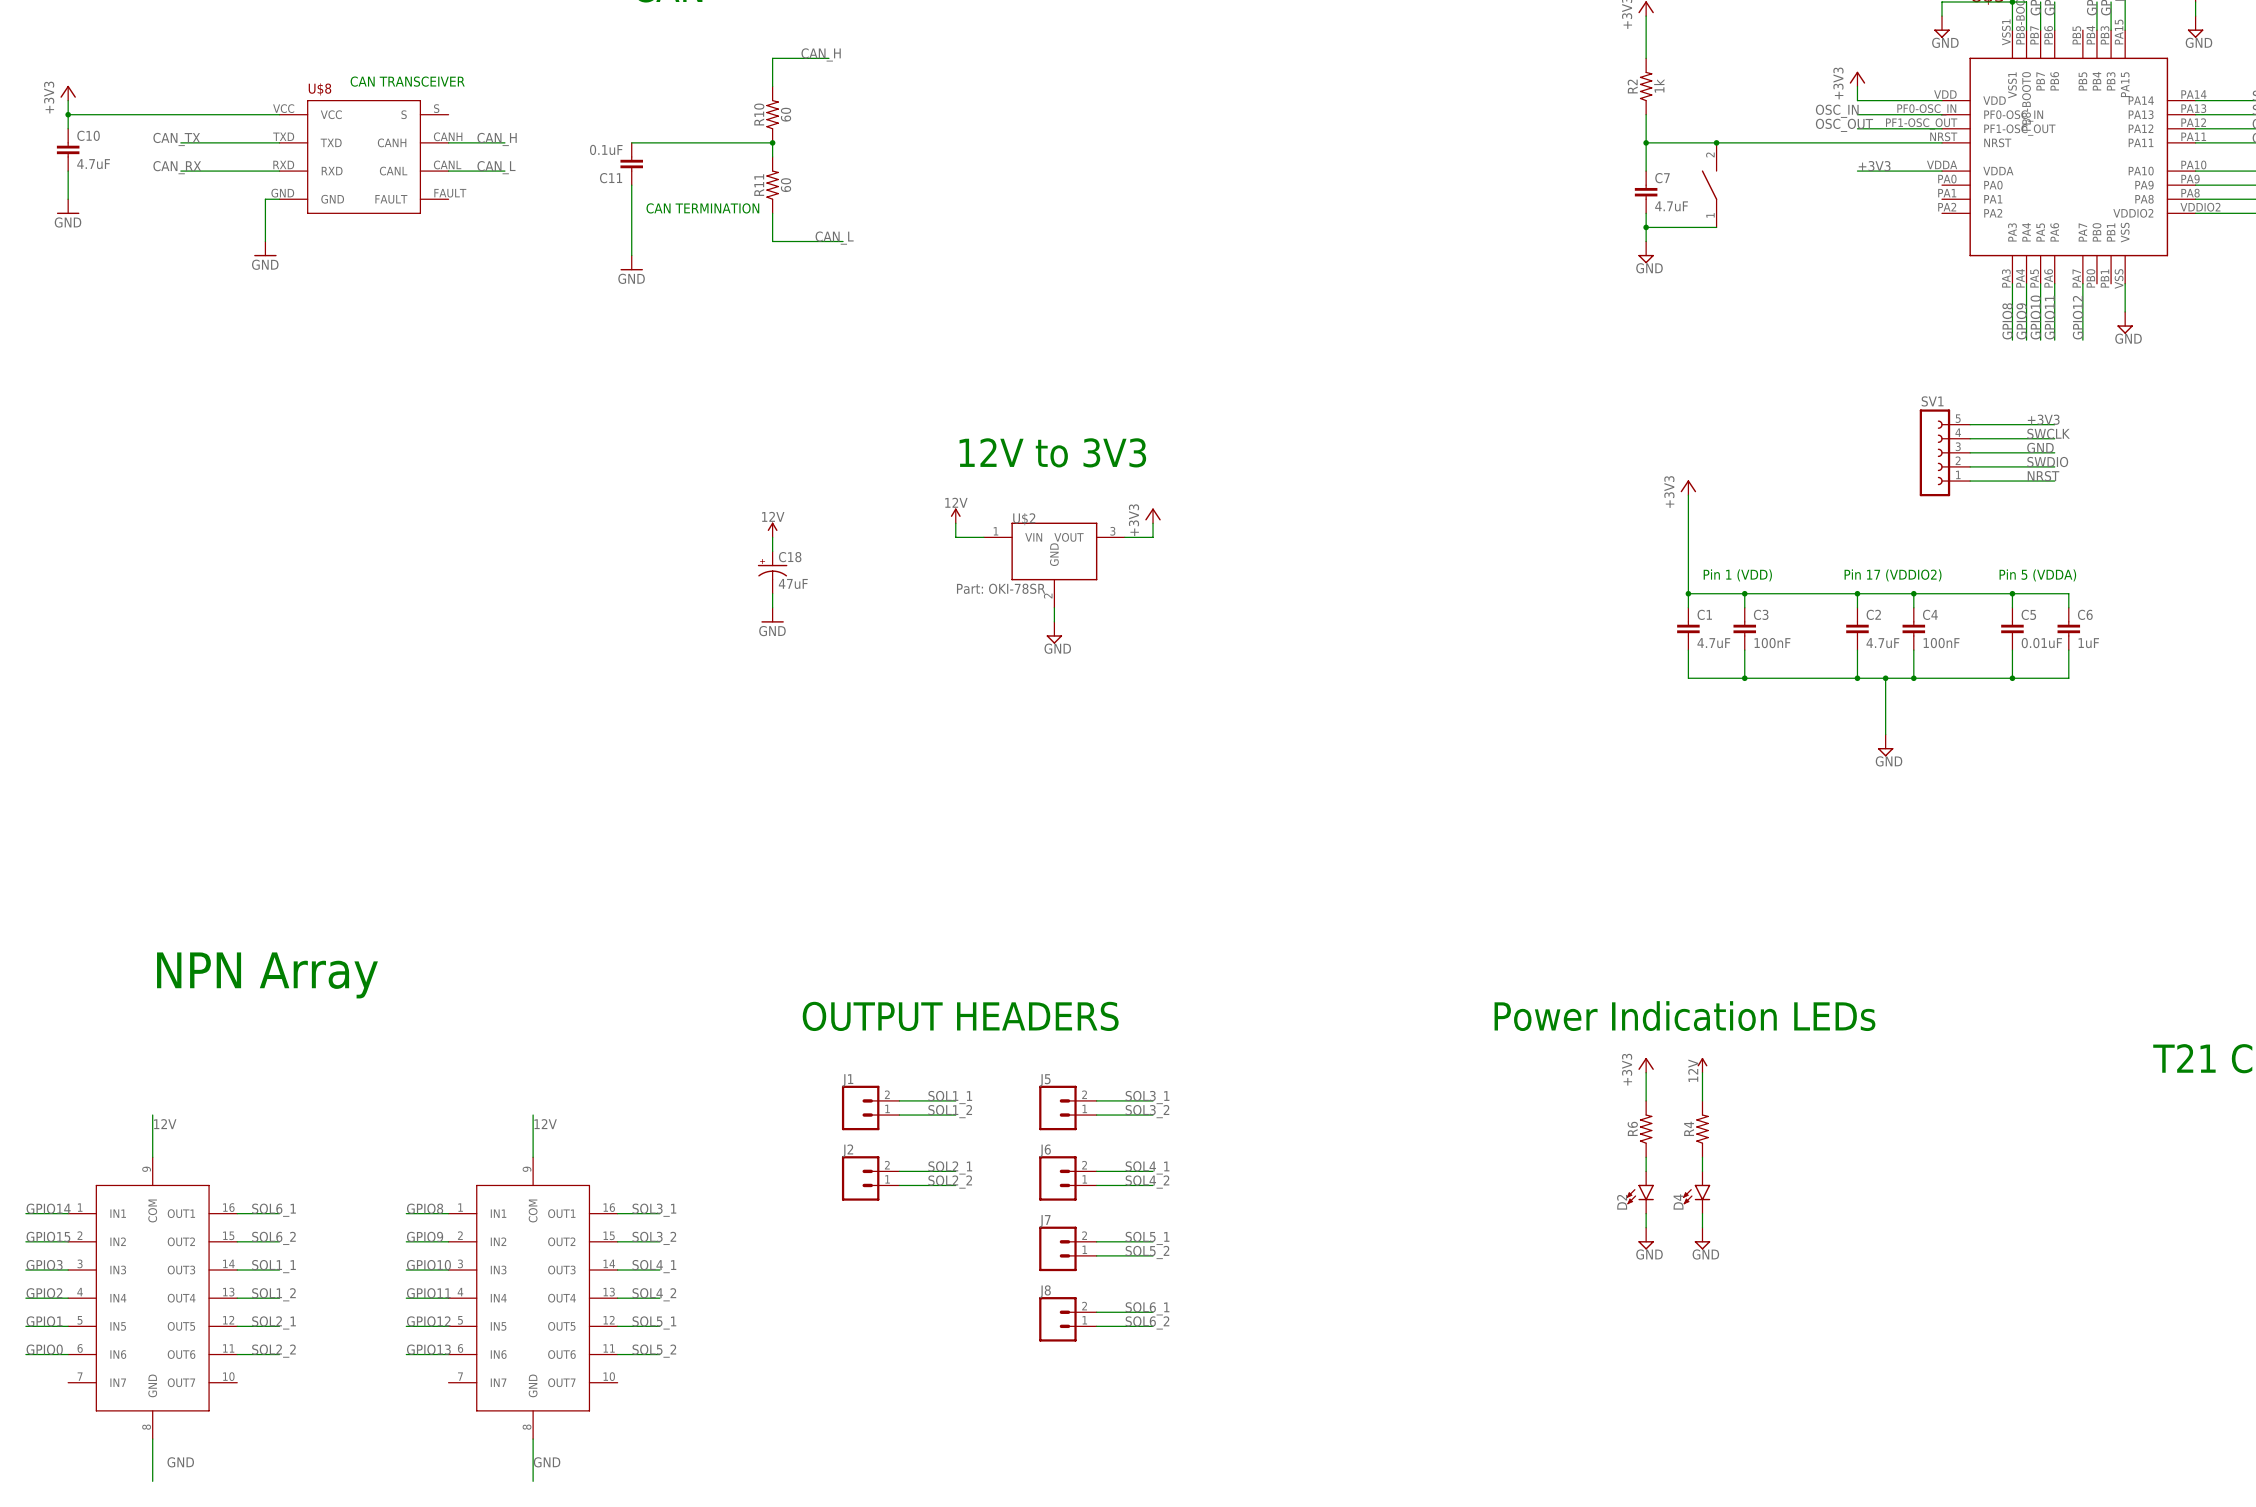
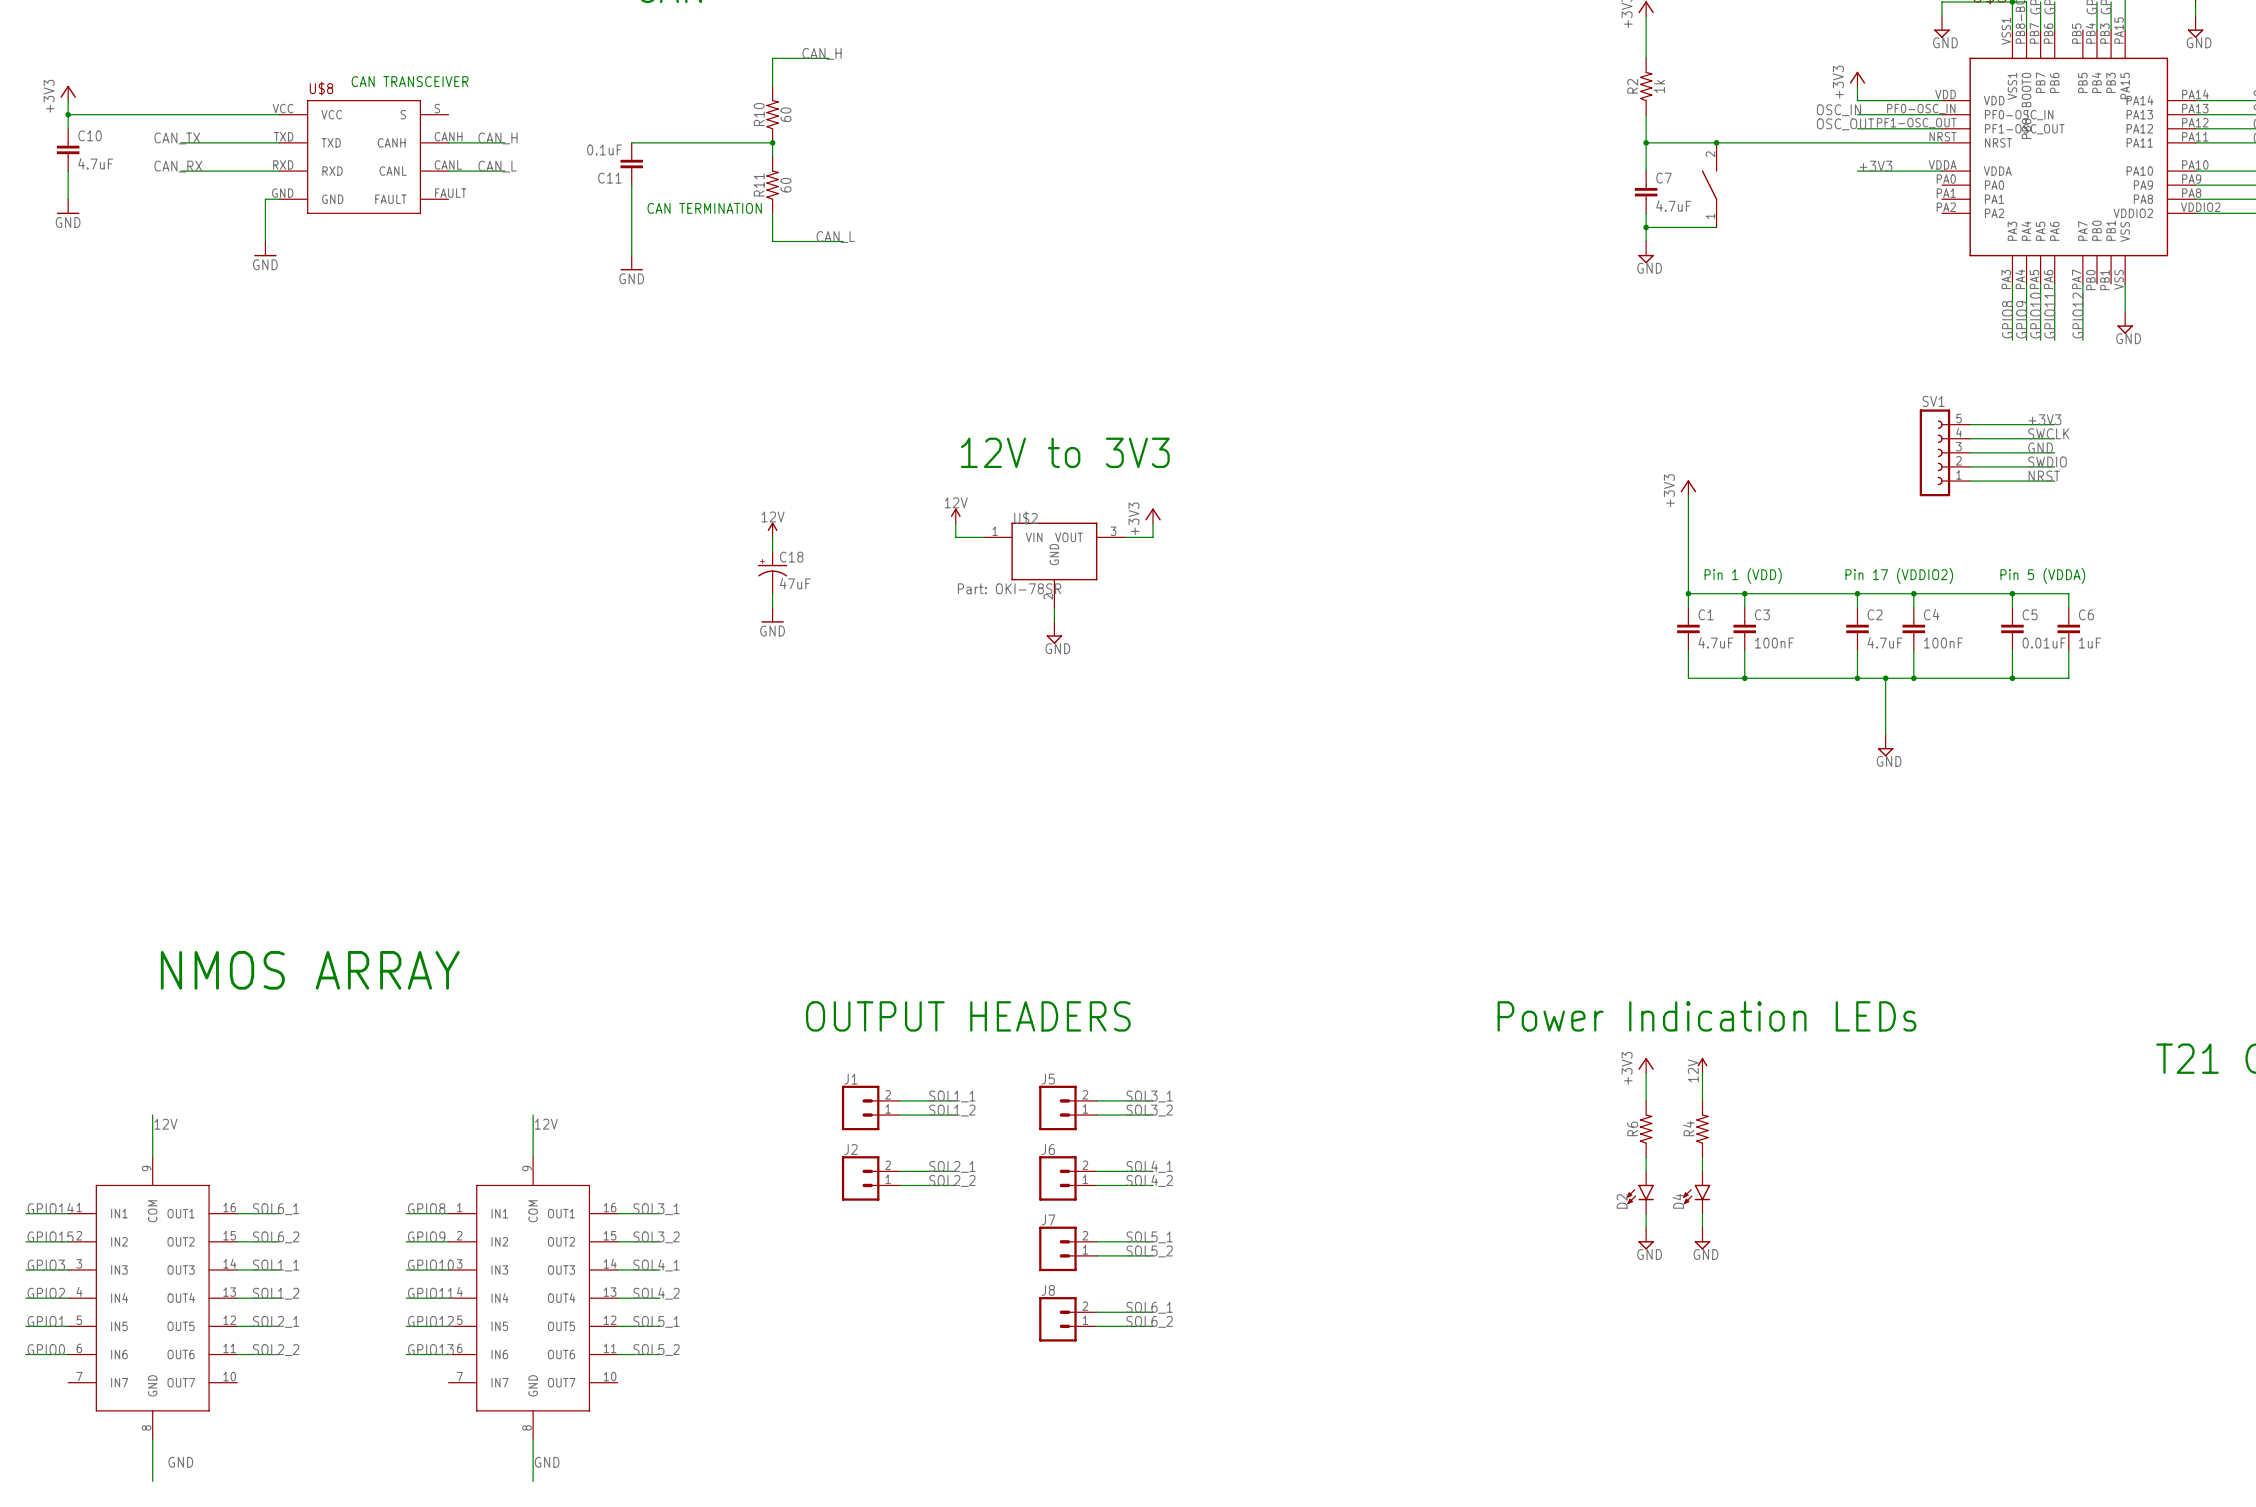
text: NPN Array (267, 975) -> NMOS ARRAY (310, 970)

